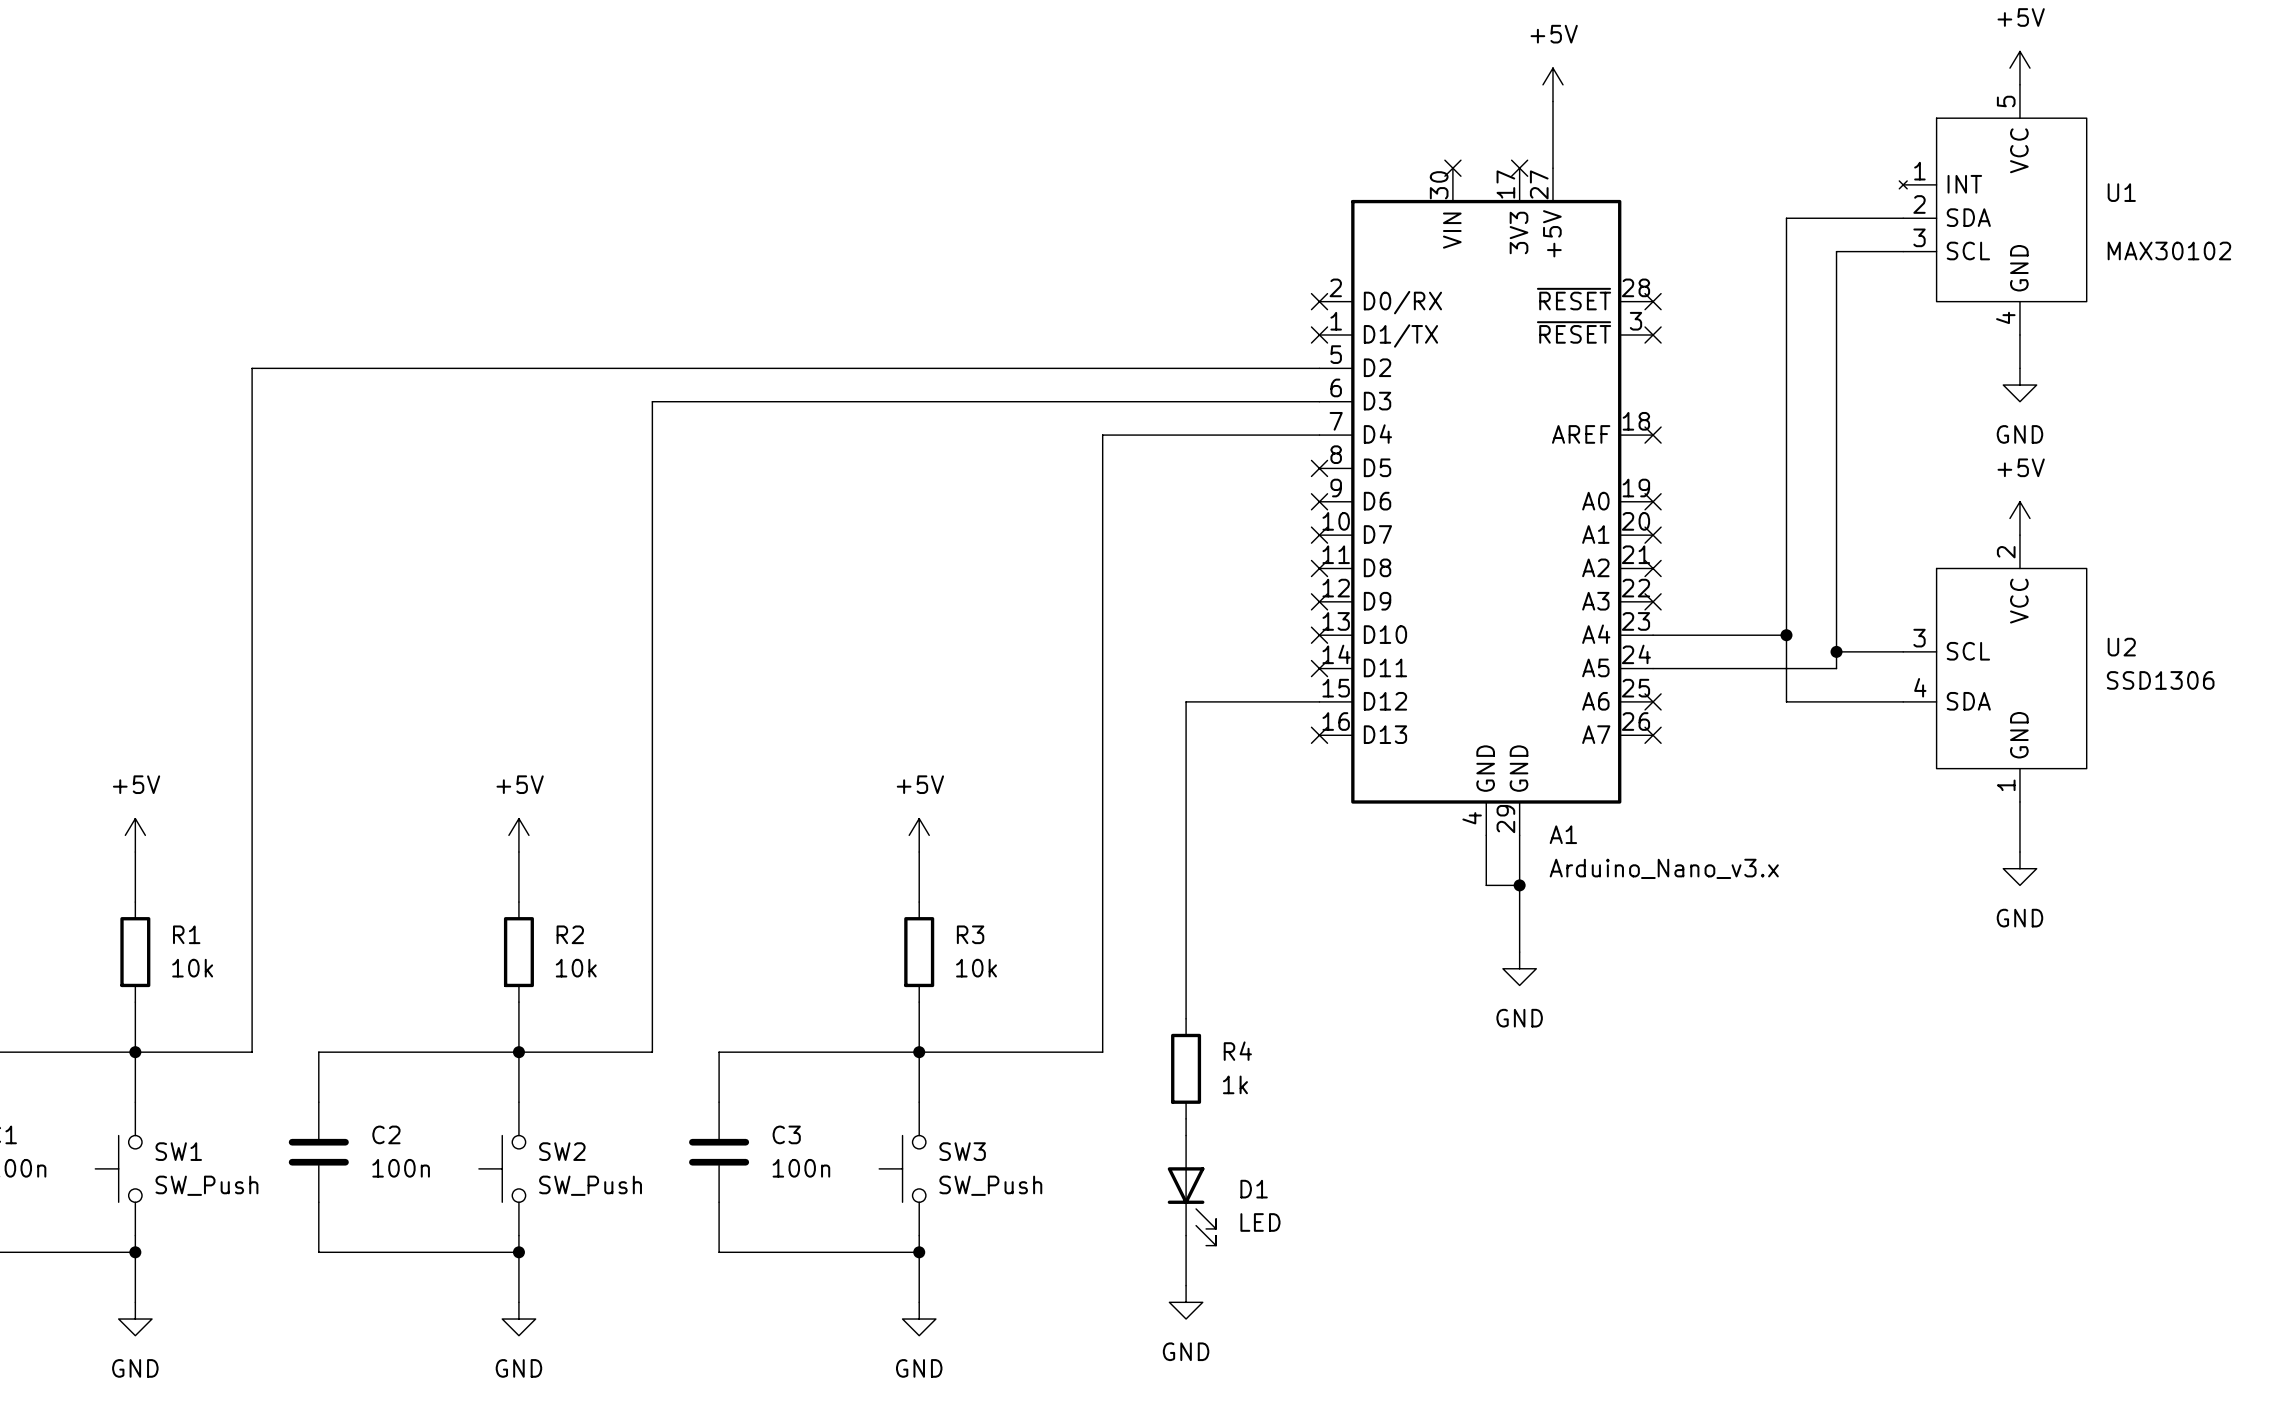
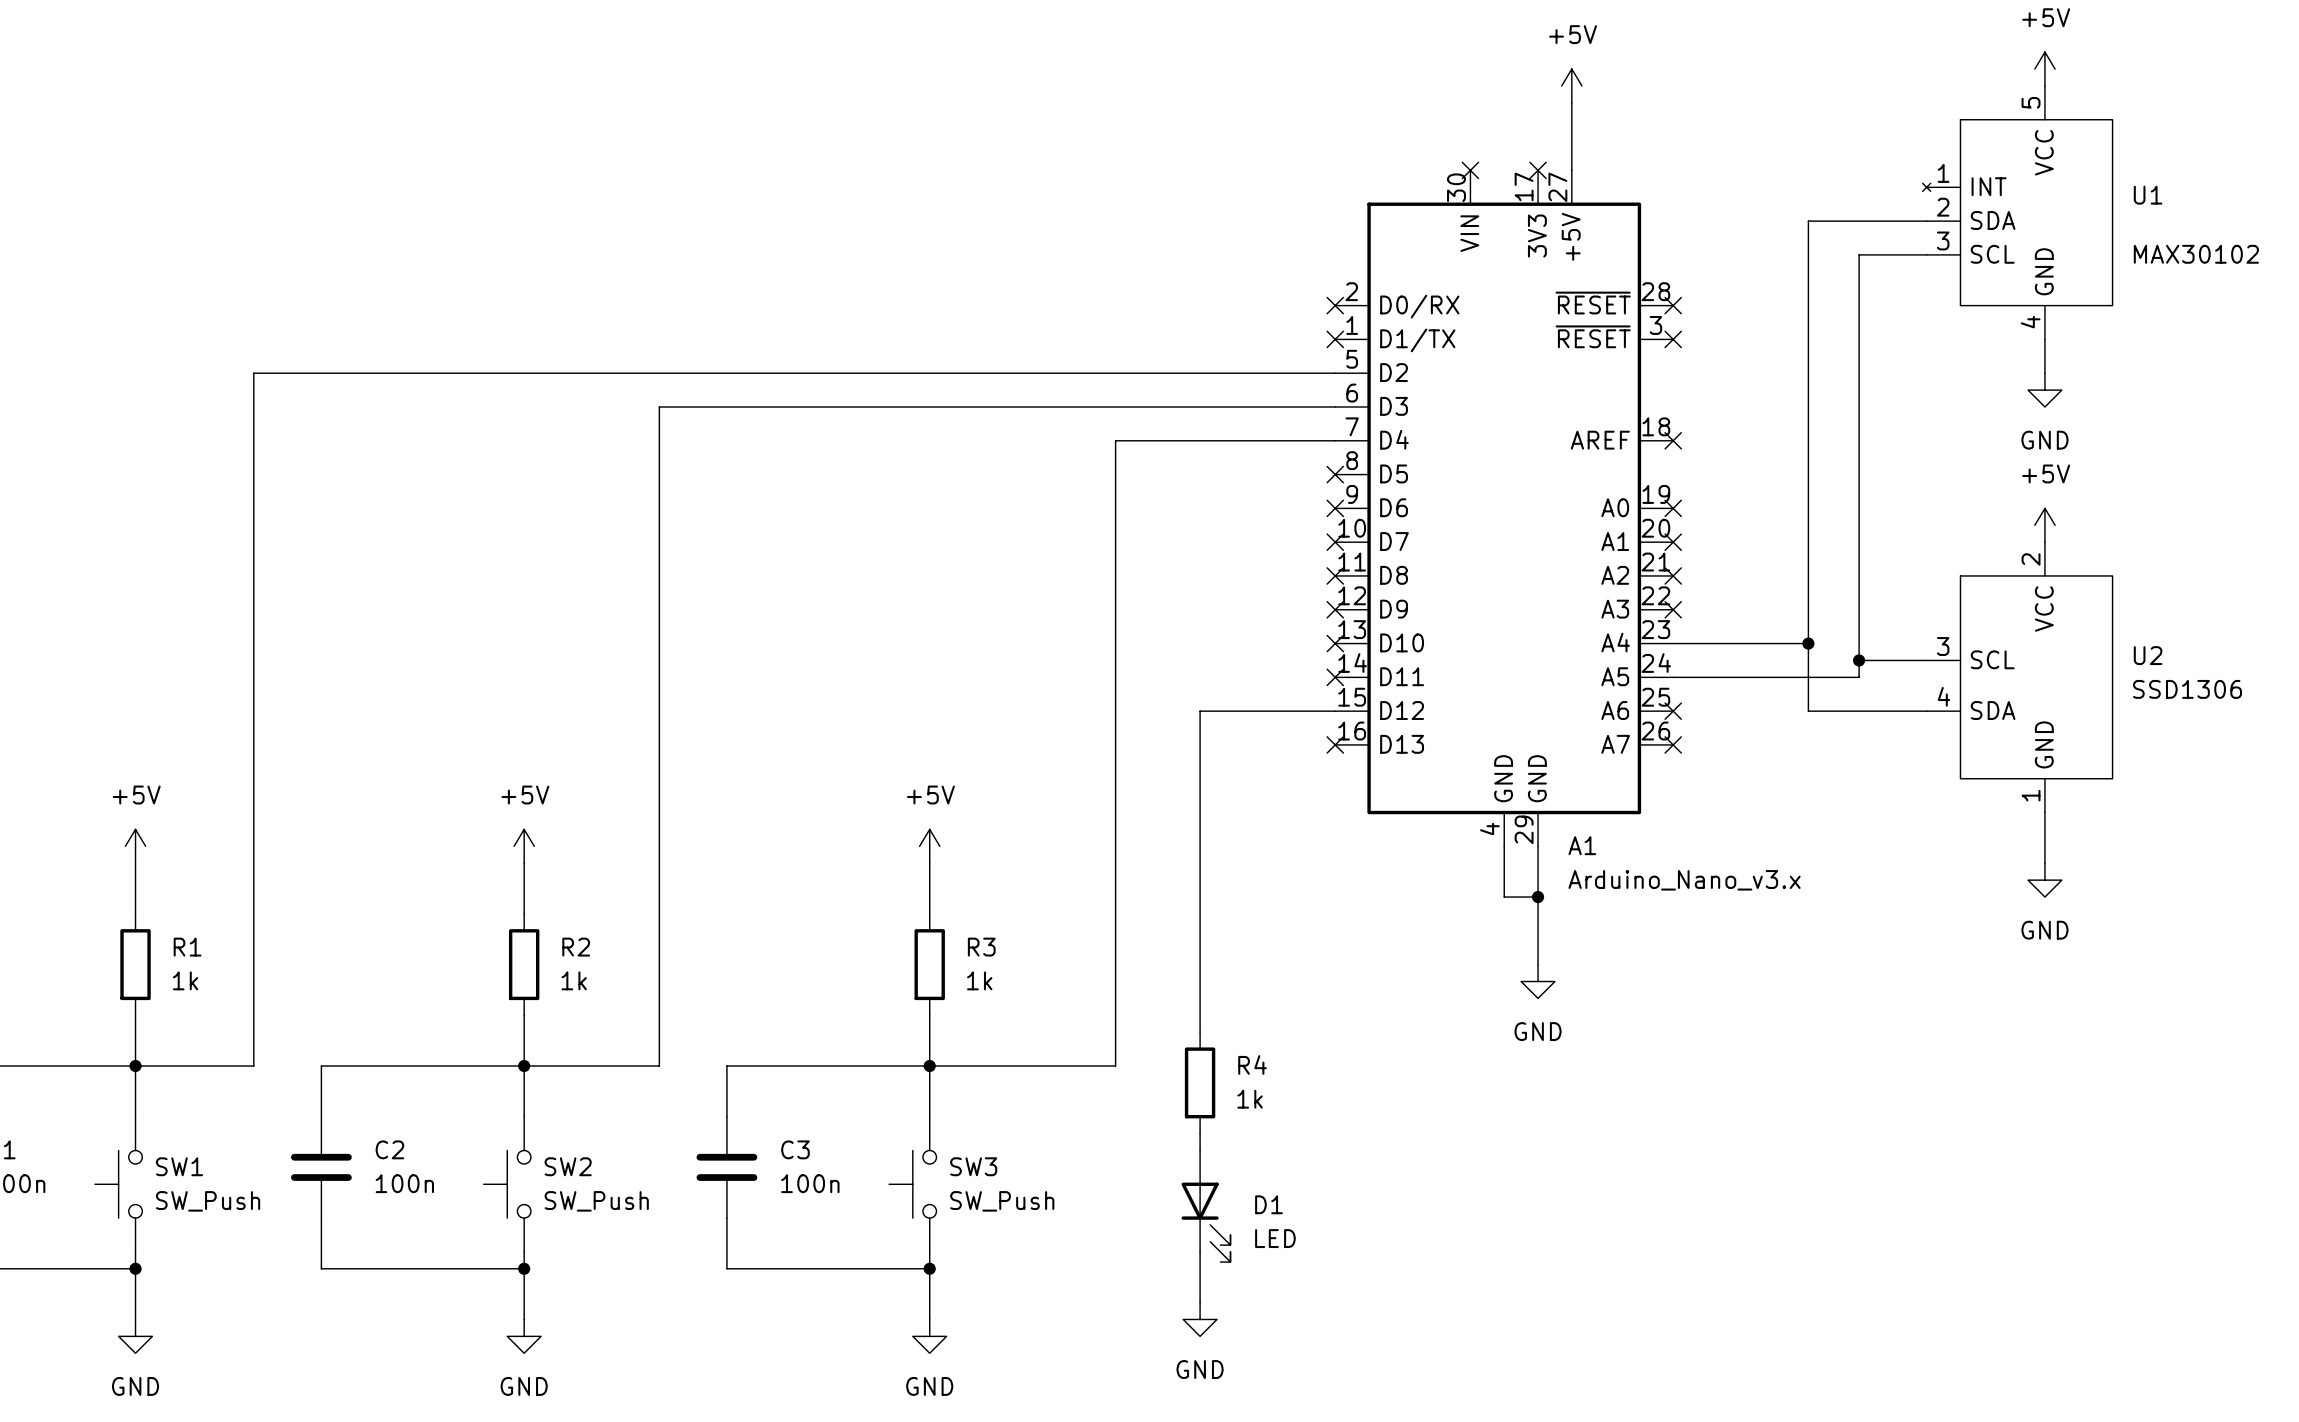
R1 value: 10k (192, 968) -> 1k (185, 980)
R2 value: 10k (576, 968) -> 1k (574, 980)
R3 value: 10k (976, 968) -> 1k (979, 980)

